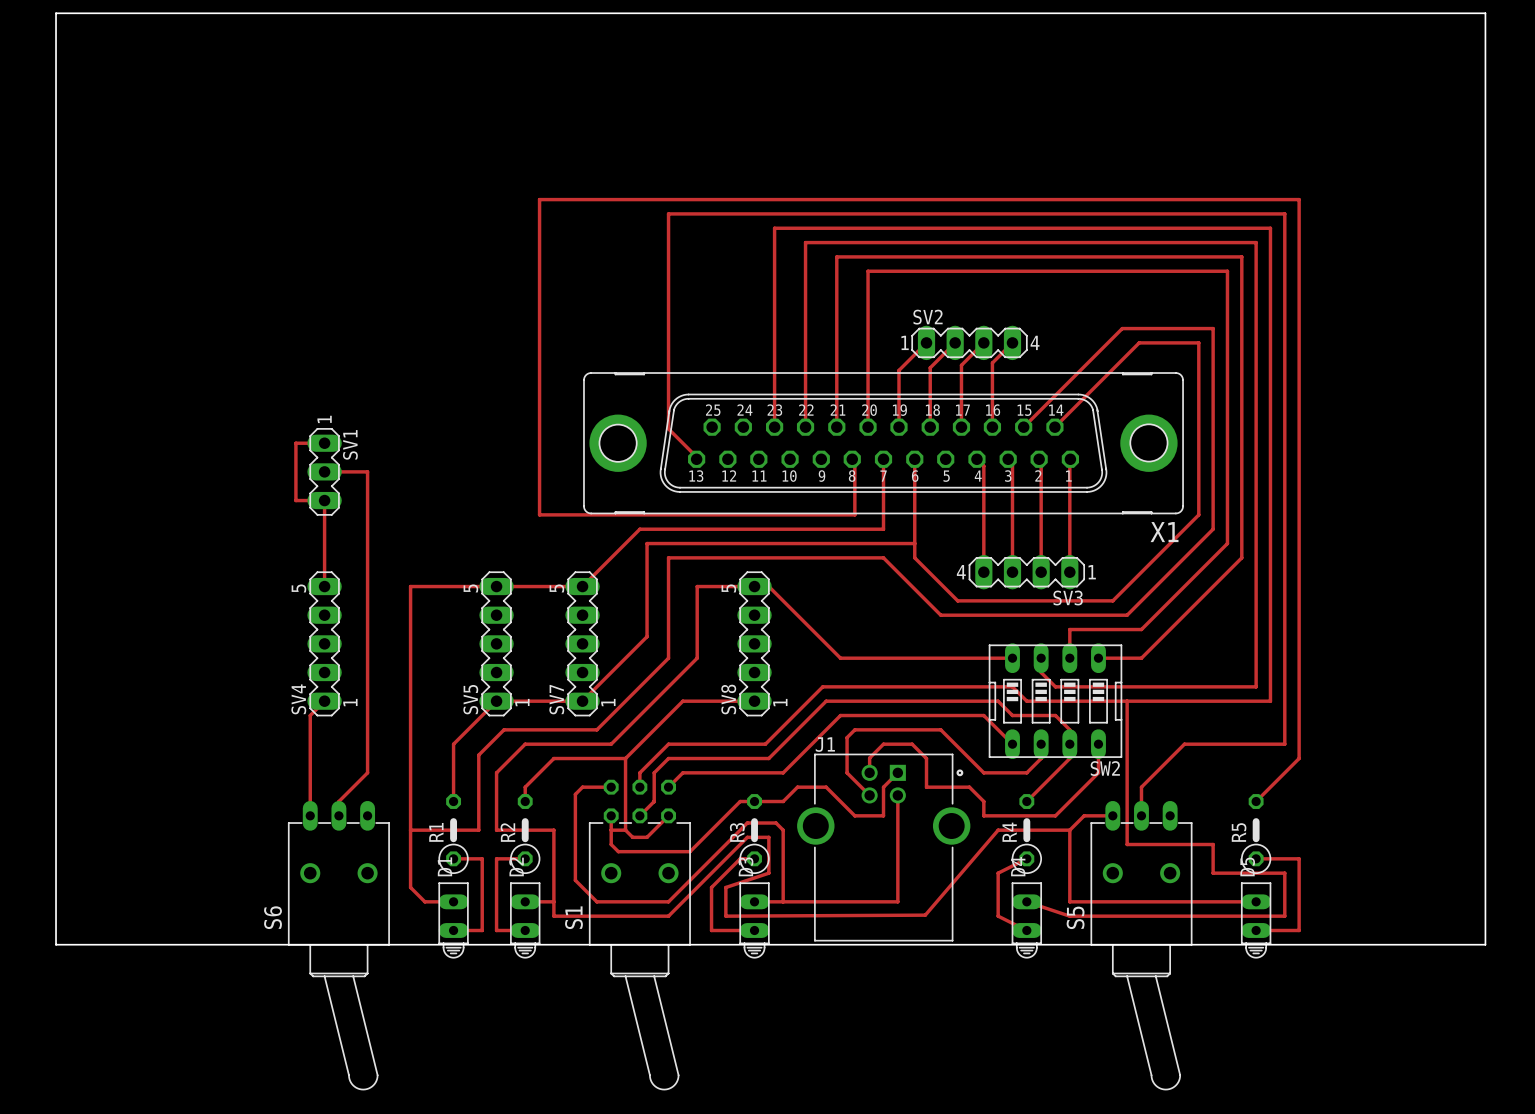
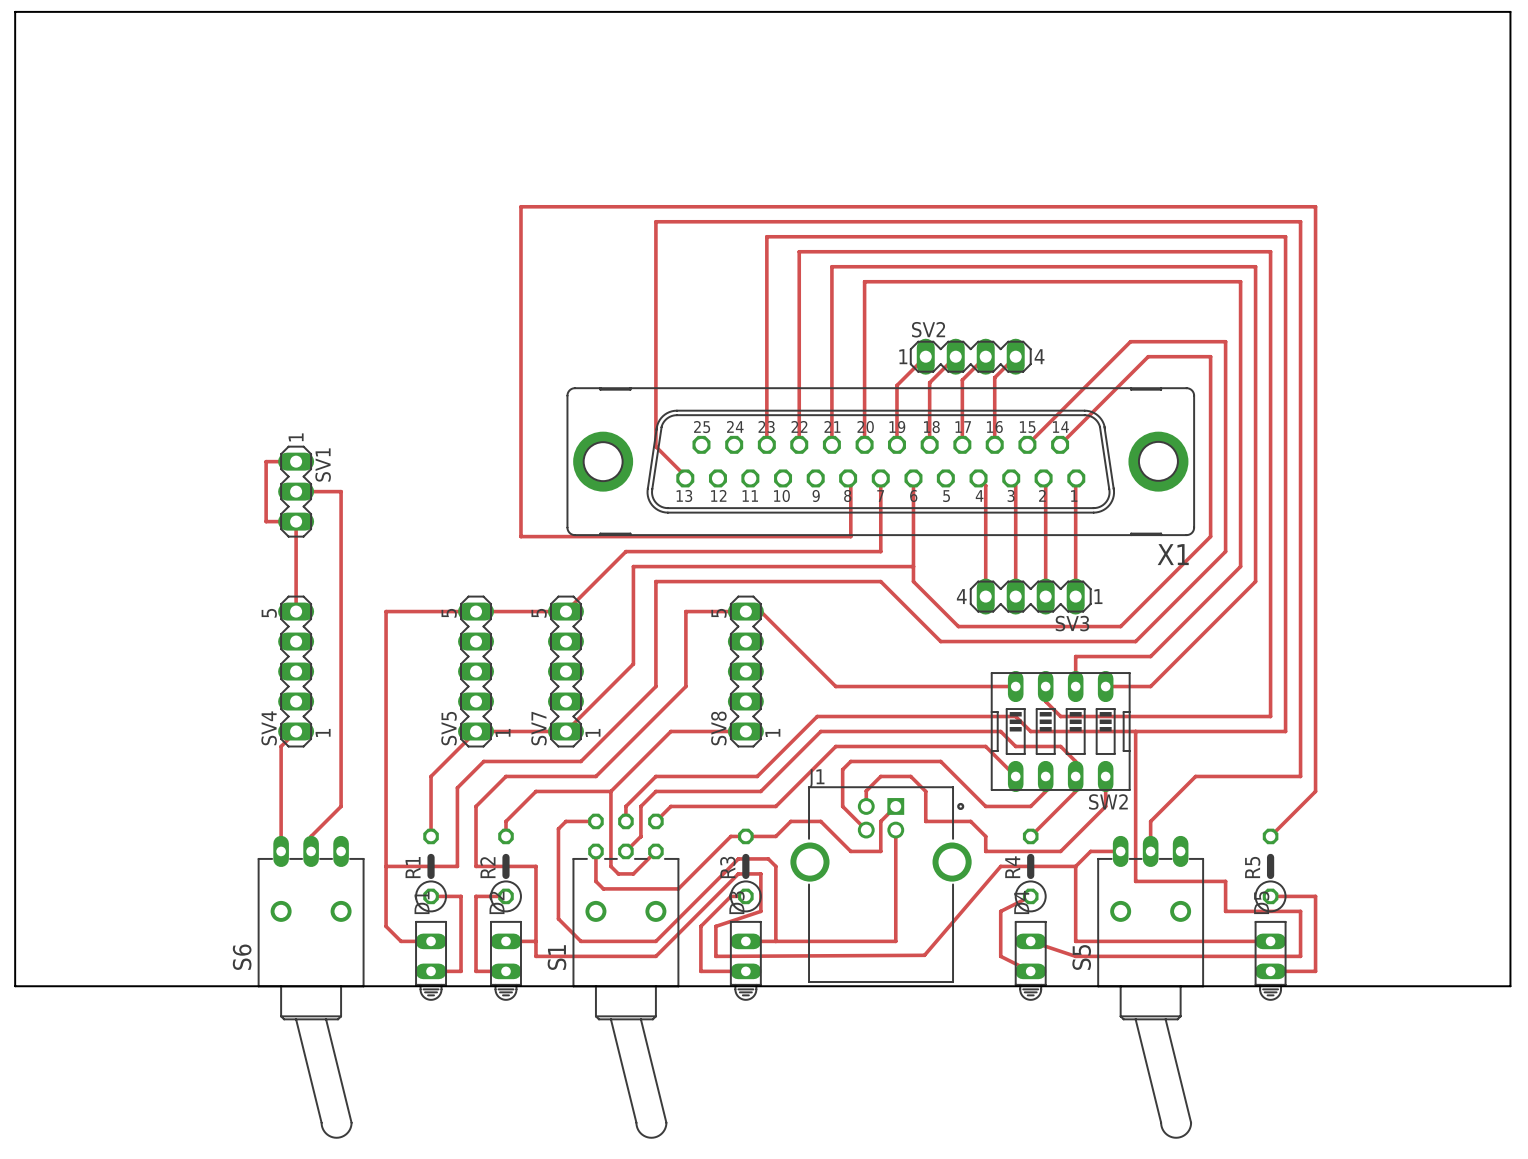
top track: (611, 830) (625, 830) -> none

